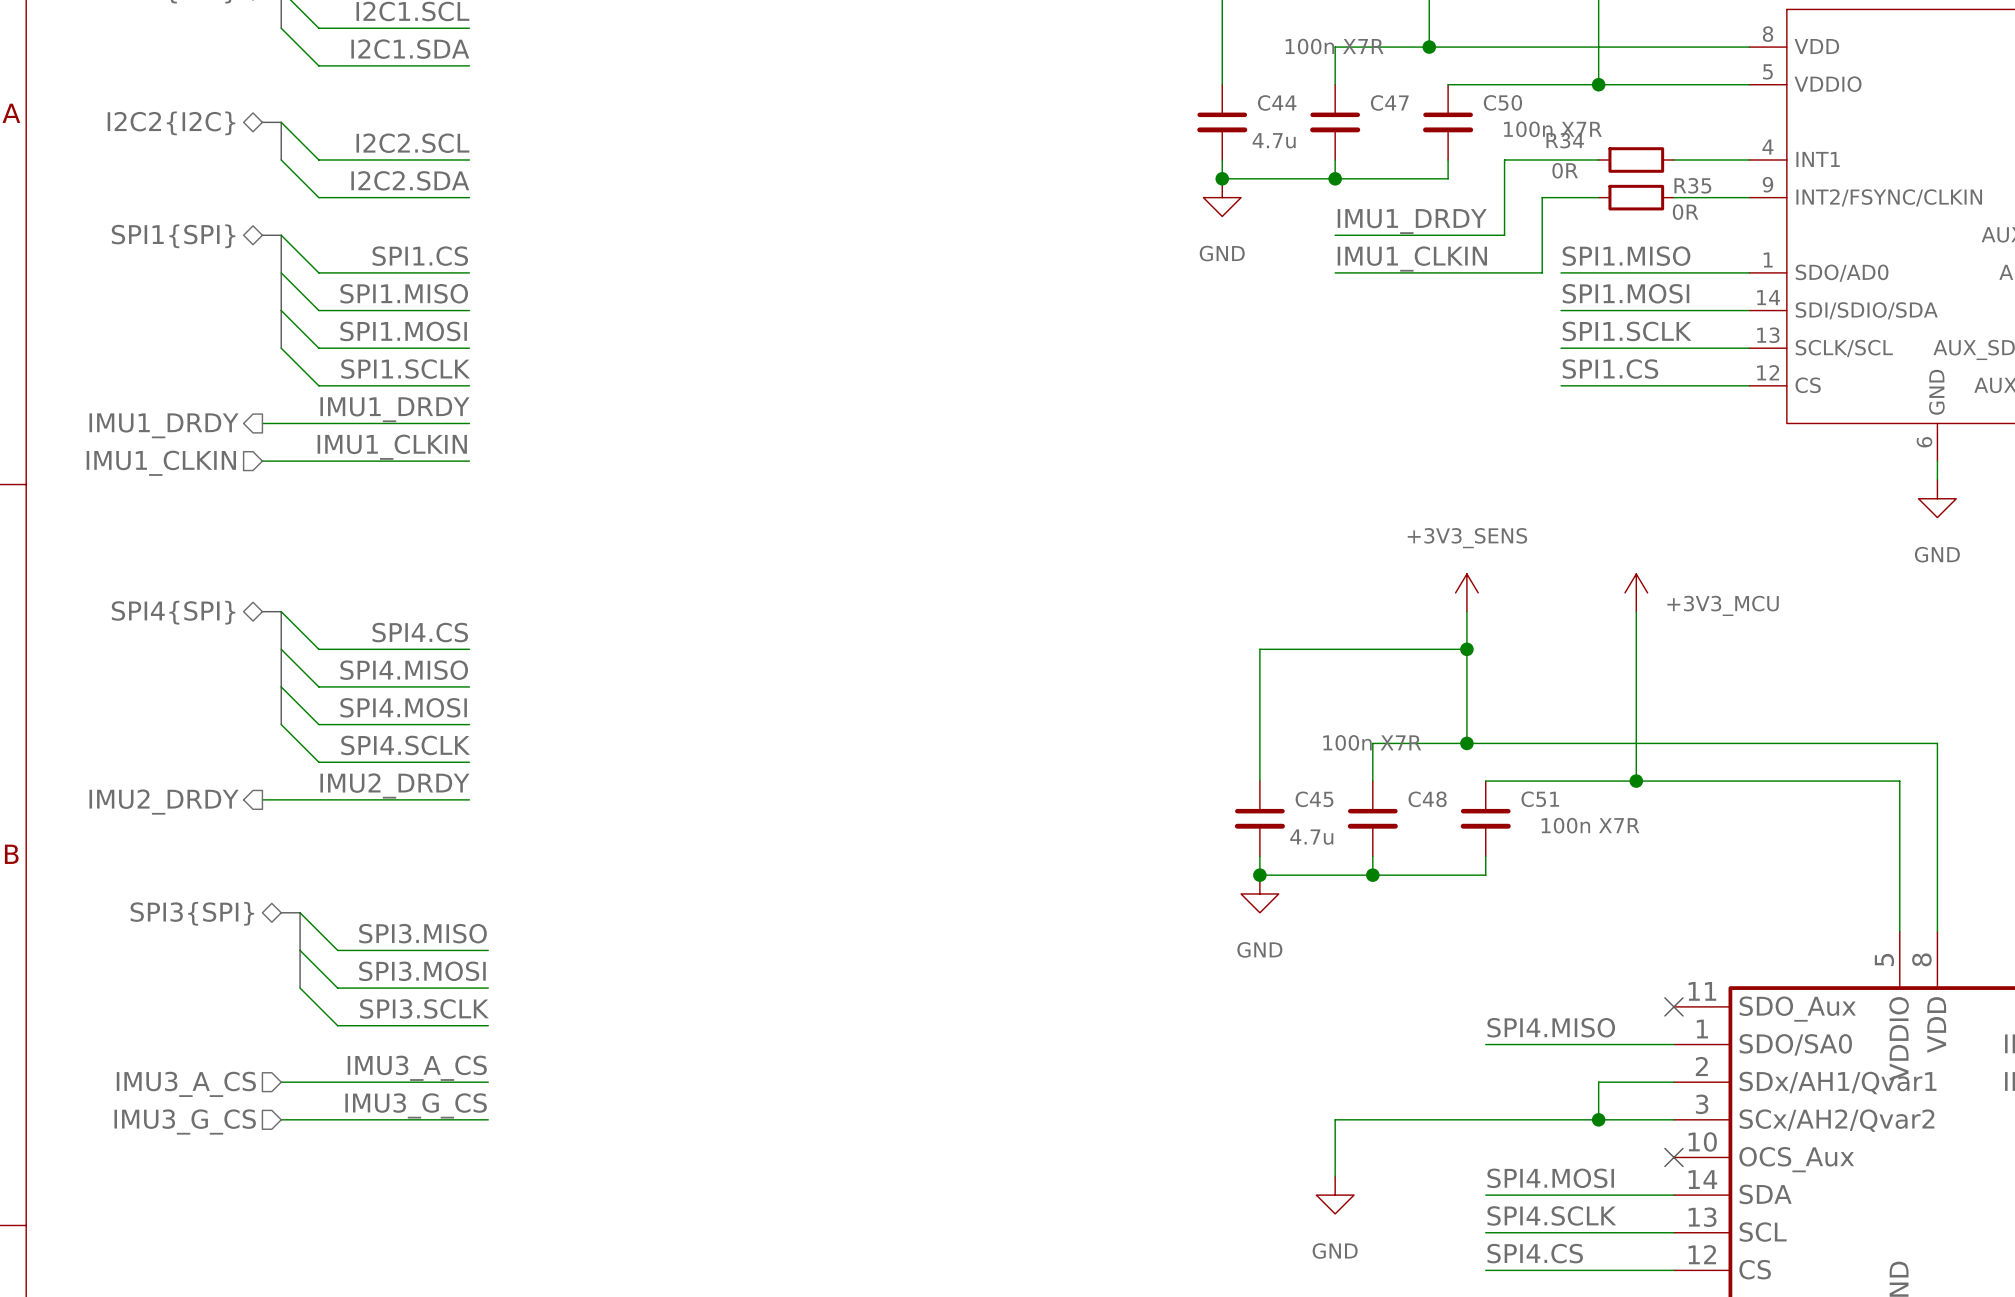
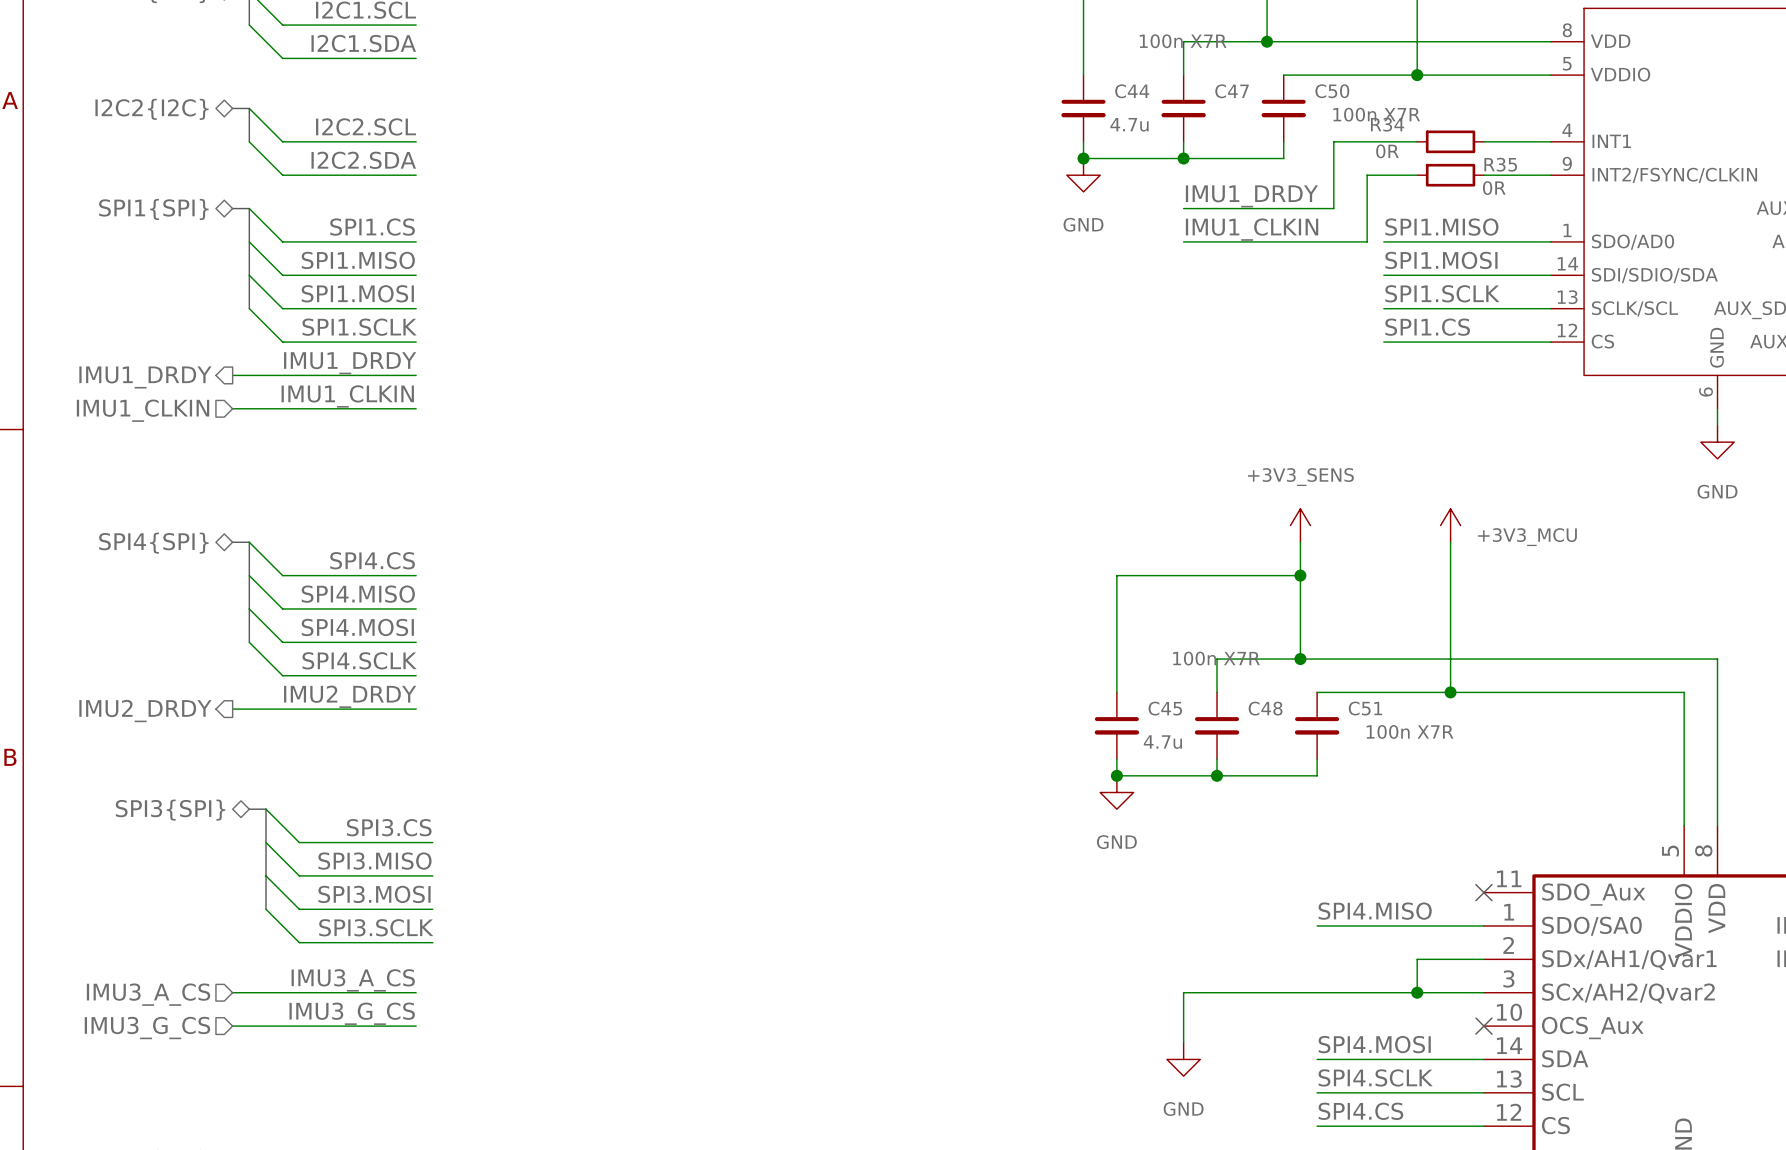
label: SPI3.MISO (423, 933) -> SPI3.CS (389, 827)
label: SPI3.MOSI (422, 971) -> SPI3.MISO (374, 861)
bus: none -> (266, 875) (266, 909)
label: SPI3.SCLK (424, 1008) -> SPI3.MOSI (374, 894)
wire: none -> (266, 909) (299, 942) (432, 942)
label: none -> SPI3.SCLK (376, 927)
label position: IMU3_A_CS (417, 1068) -> IMU3_A_CS (353, 980)
wire: (281, 1082) (488, 1082) -> (232, 1026) (416, 1026)
hierarchical label position: IMU3_A_CS (186, 1084) -> IMU3_A_CS (148, 994)
label position: IMU3_G_CS (416, 1105) -> IMU3_G_CS (352, 1013)
wire: (469, 1119) (488, 1119) -> (232, 992) (249, 992)
hierarchical label position: IMU3_G_CS (185, 1121) -> IMU3_G_CS (147, 1028)

